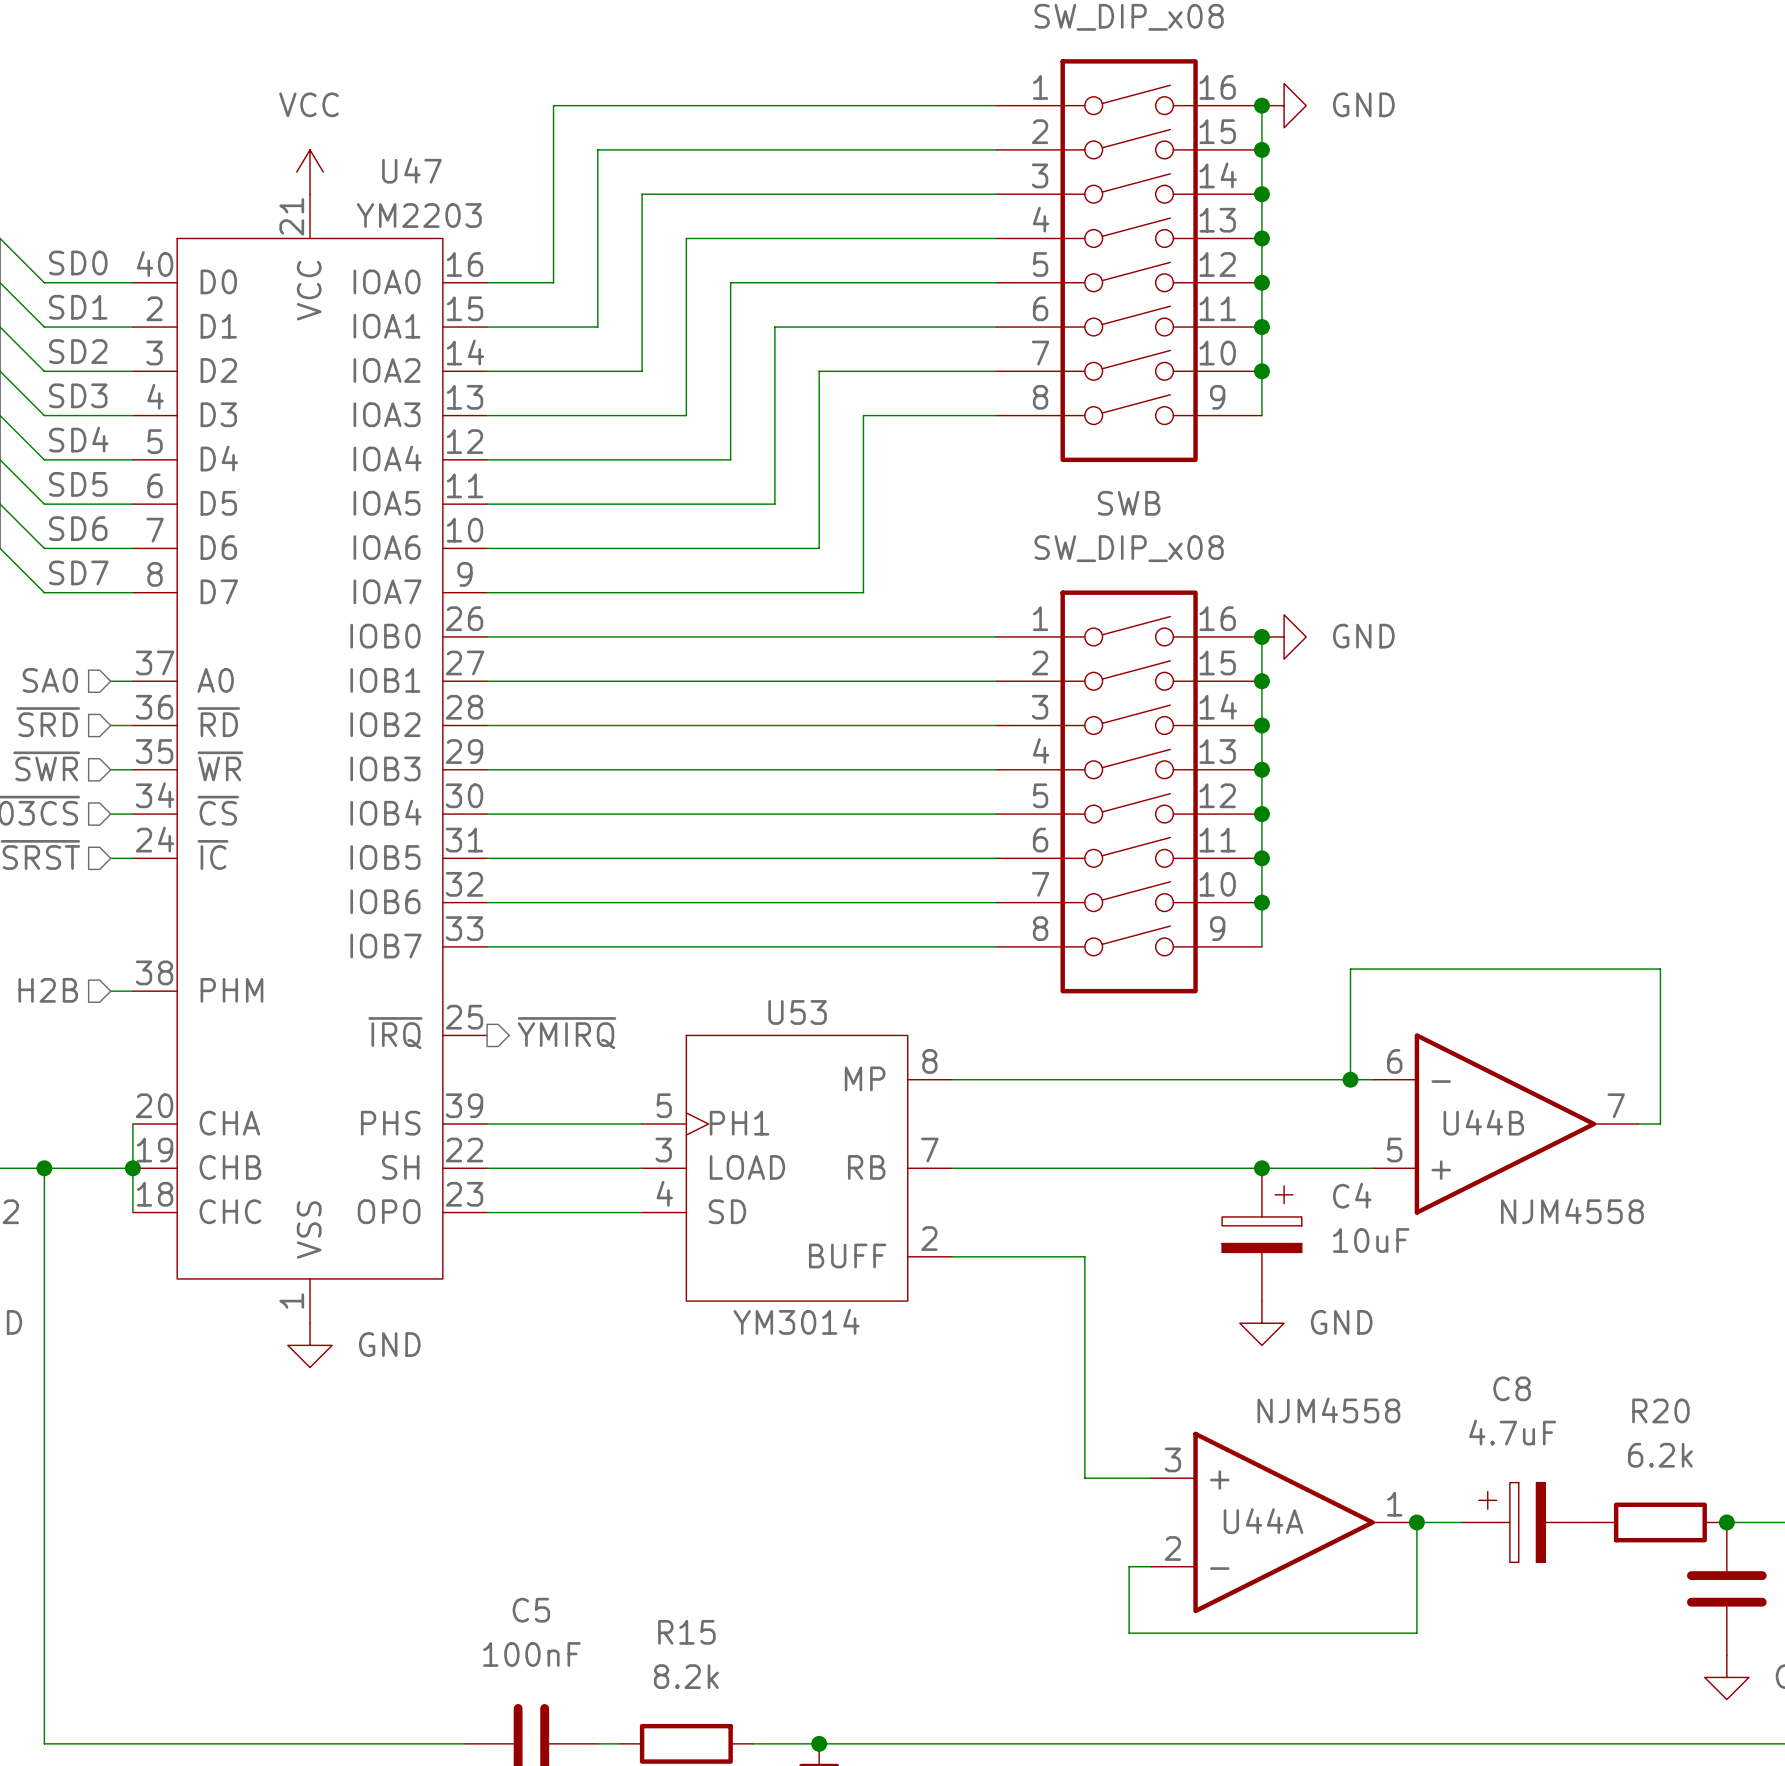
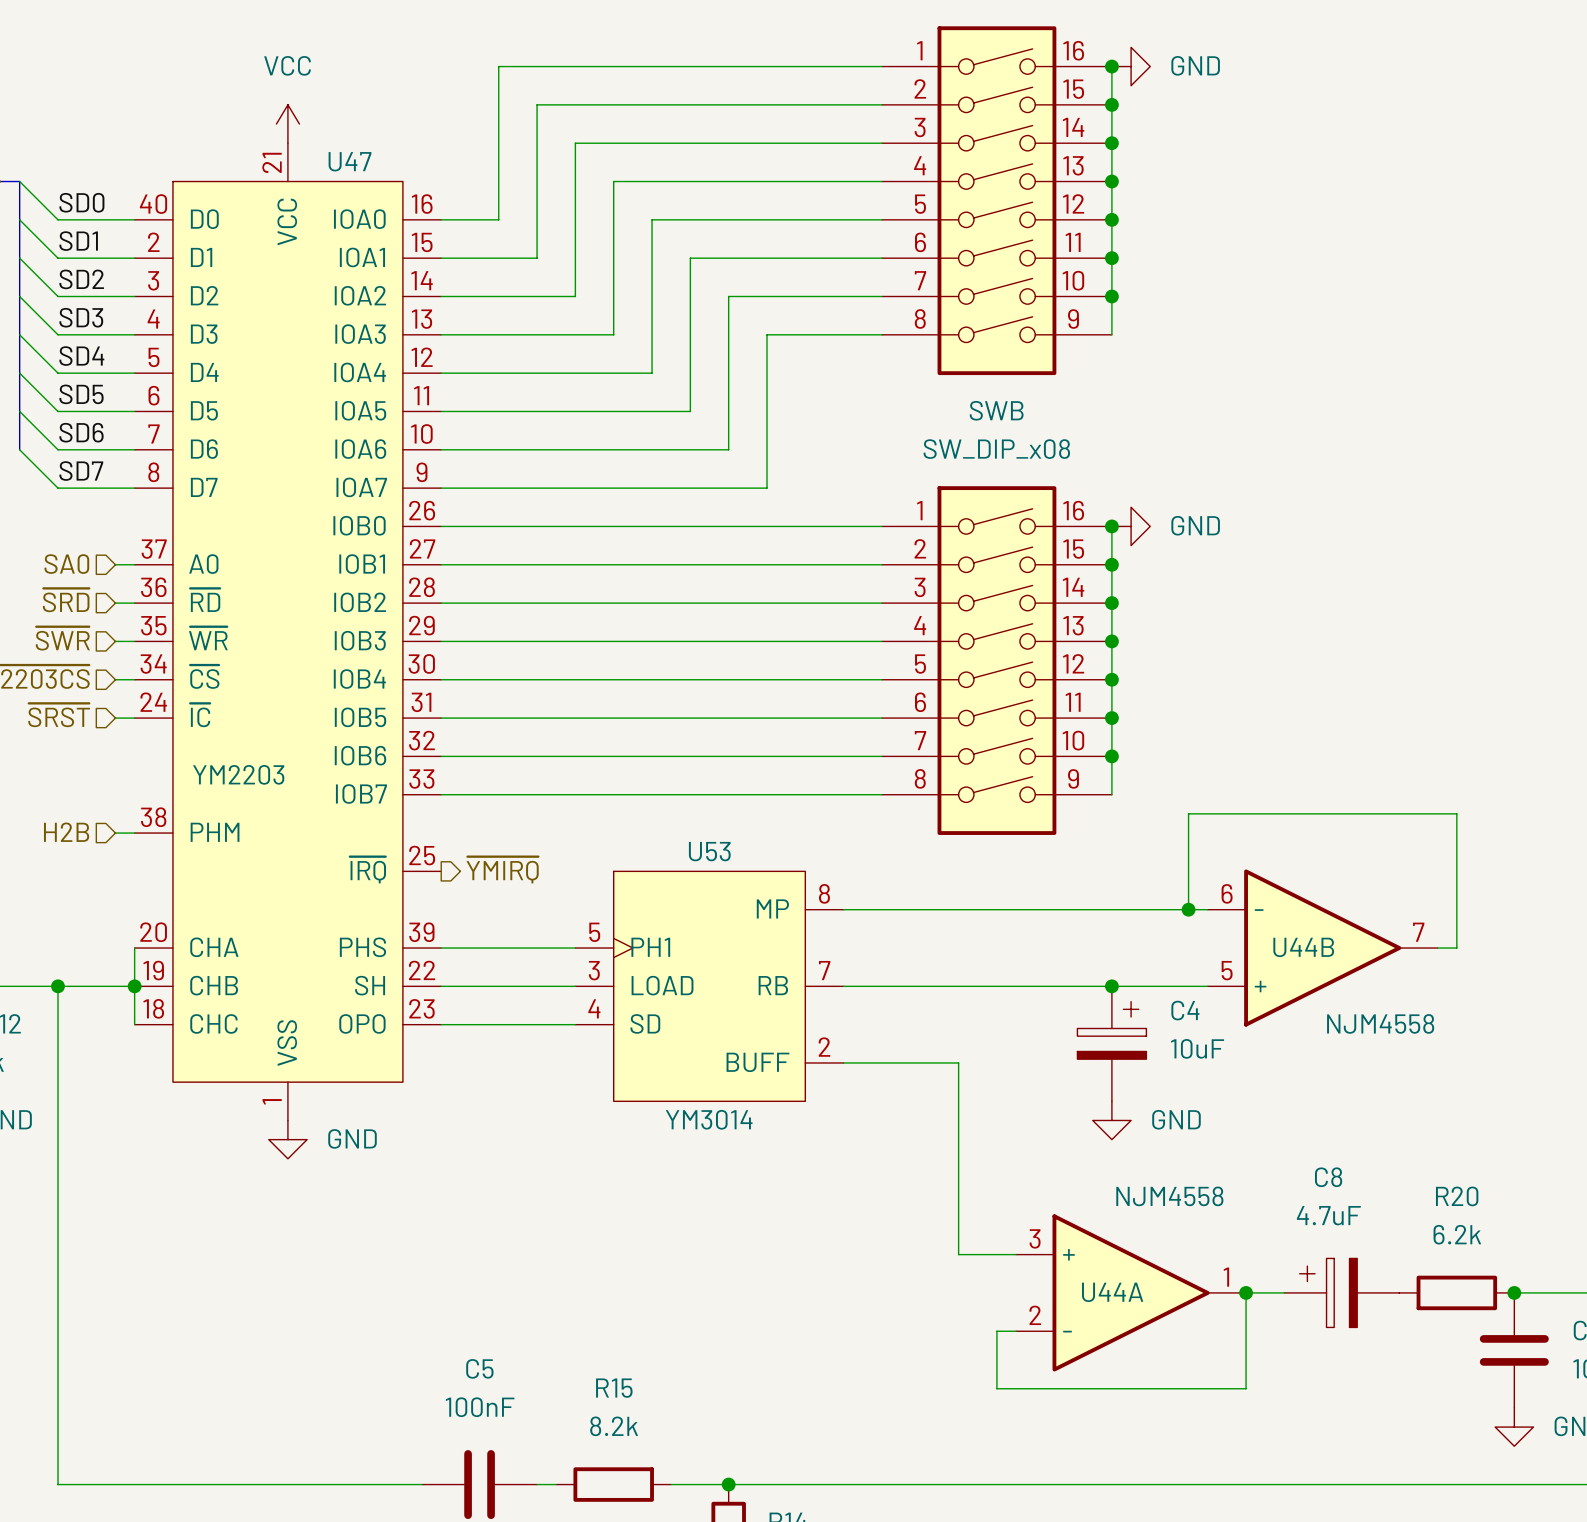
U47 name position: U47 (411, 170) -> U47 (350, 161)
U47 value position: YM2203 (419, 215) -> YM2203 (238, 774)

